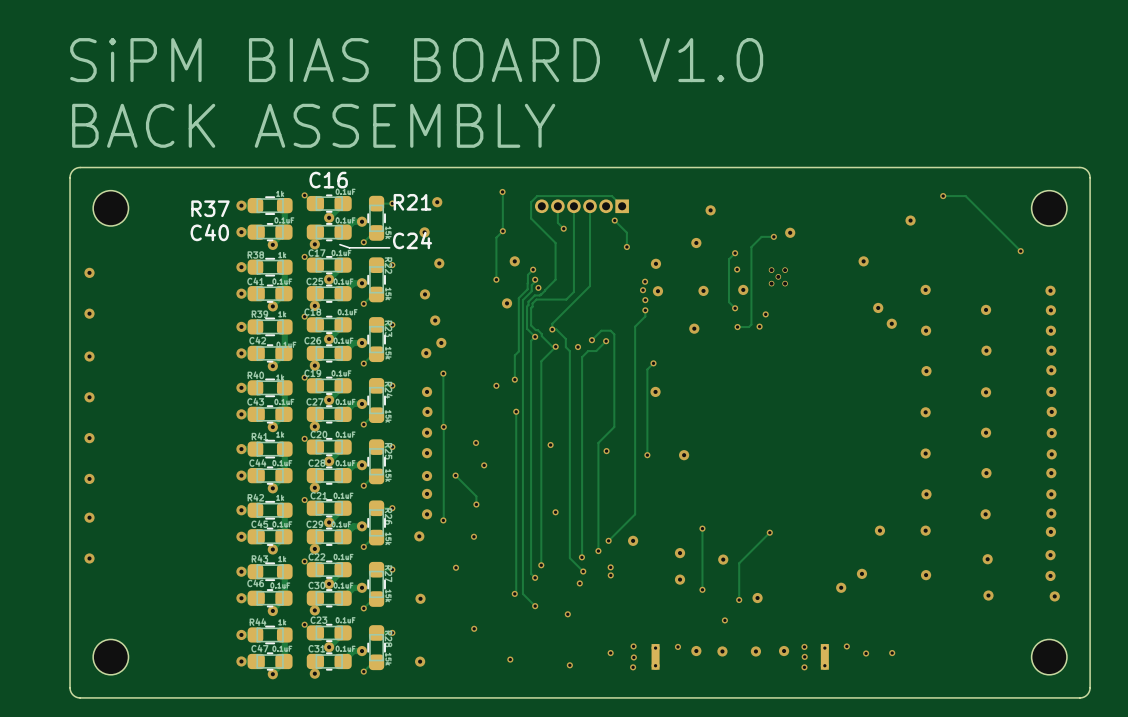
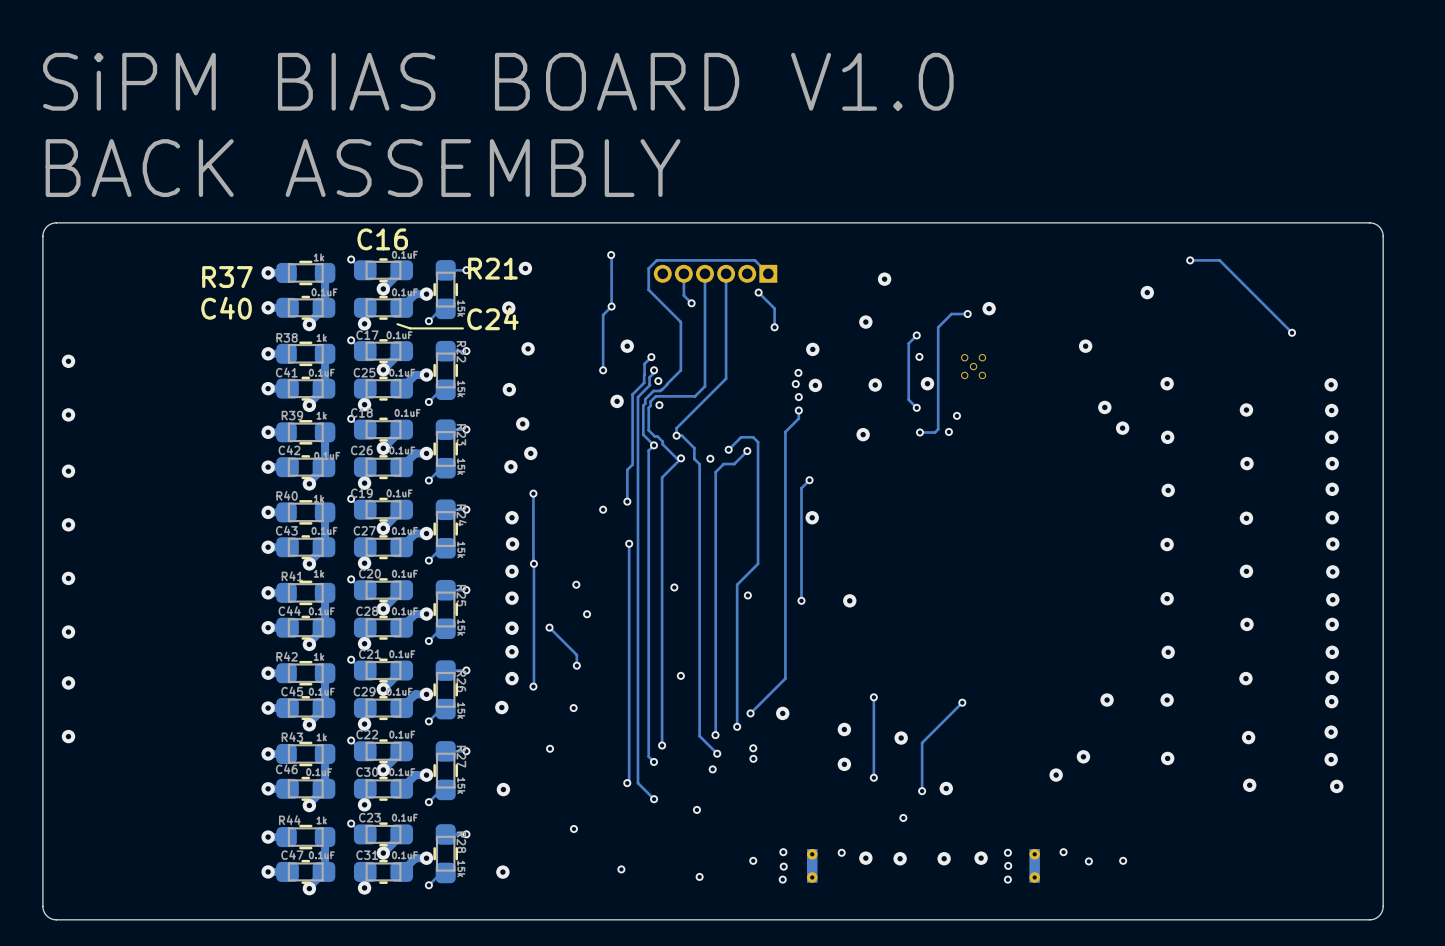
part: (110, 208) -> none
part: (1049, 208) -> none
via: none -> (659, 405)
part: (110, 657) -> none
part: (1049, 657) -> none

